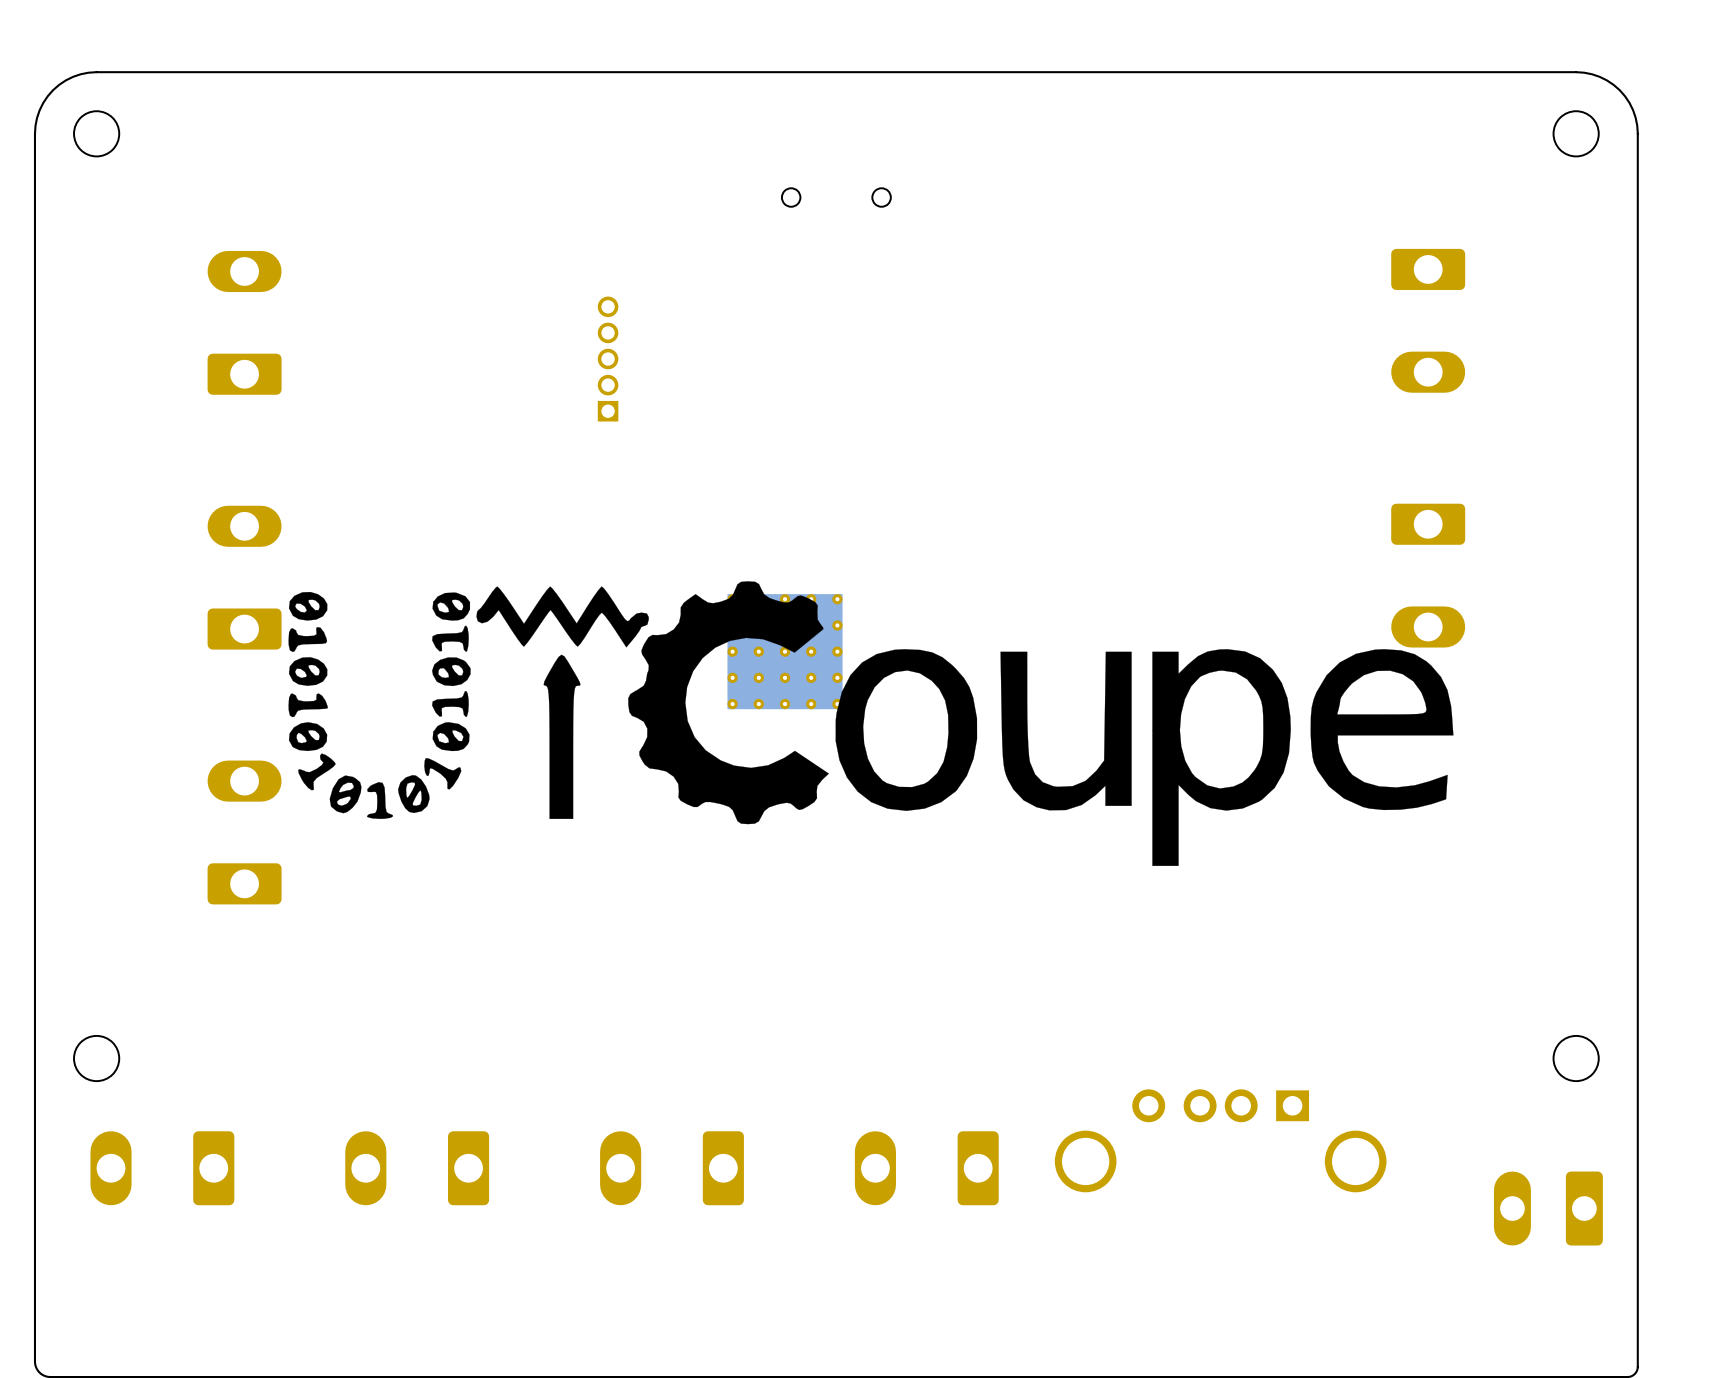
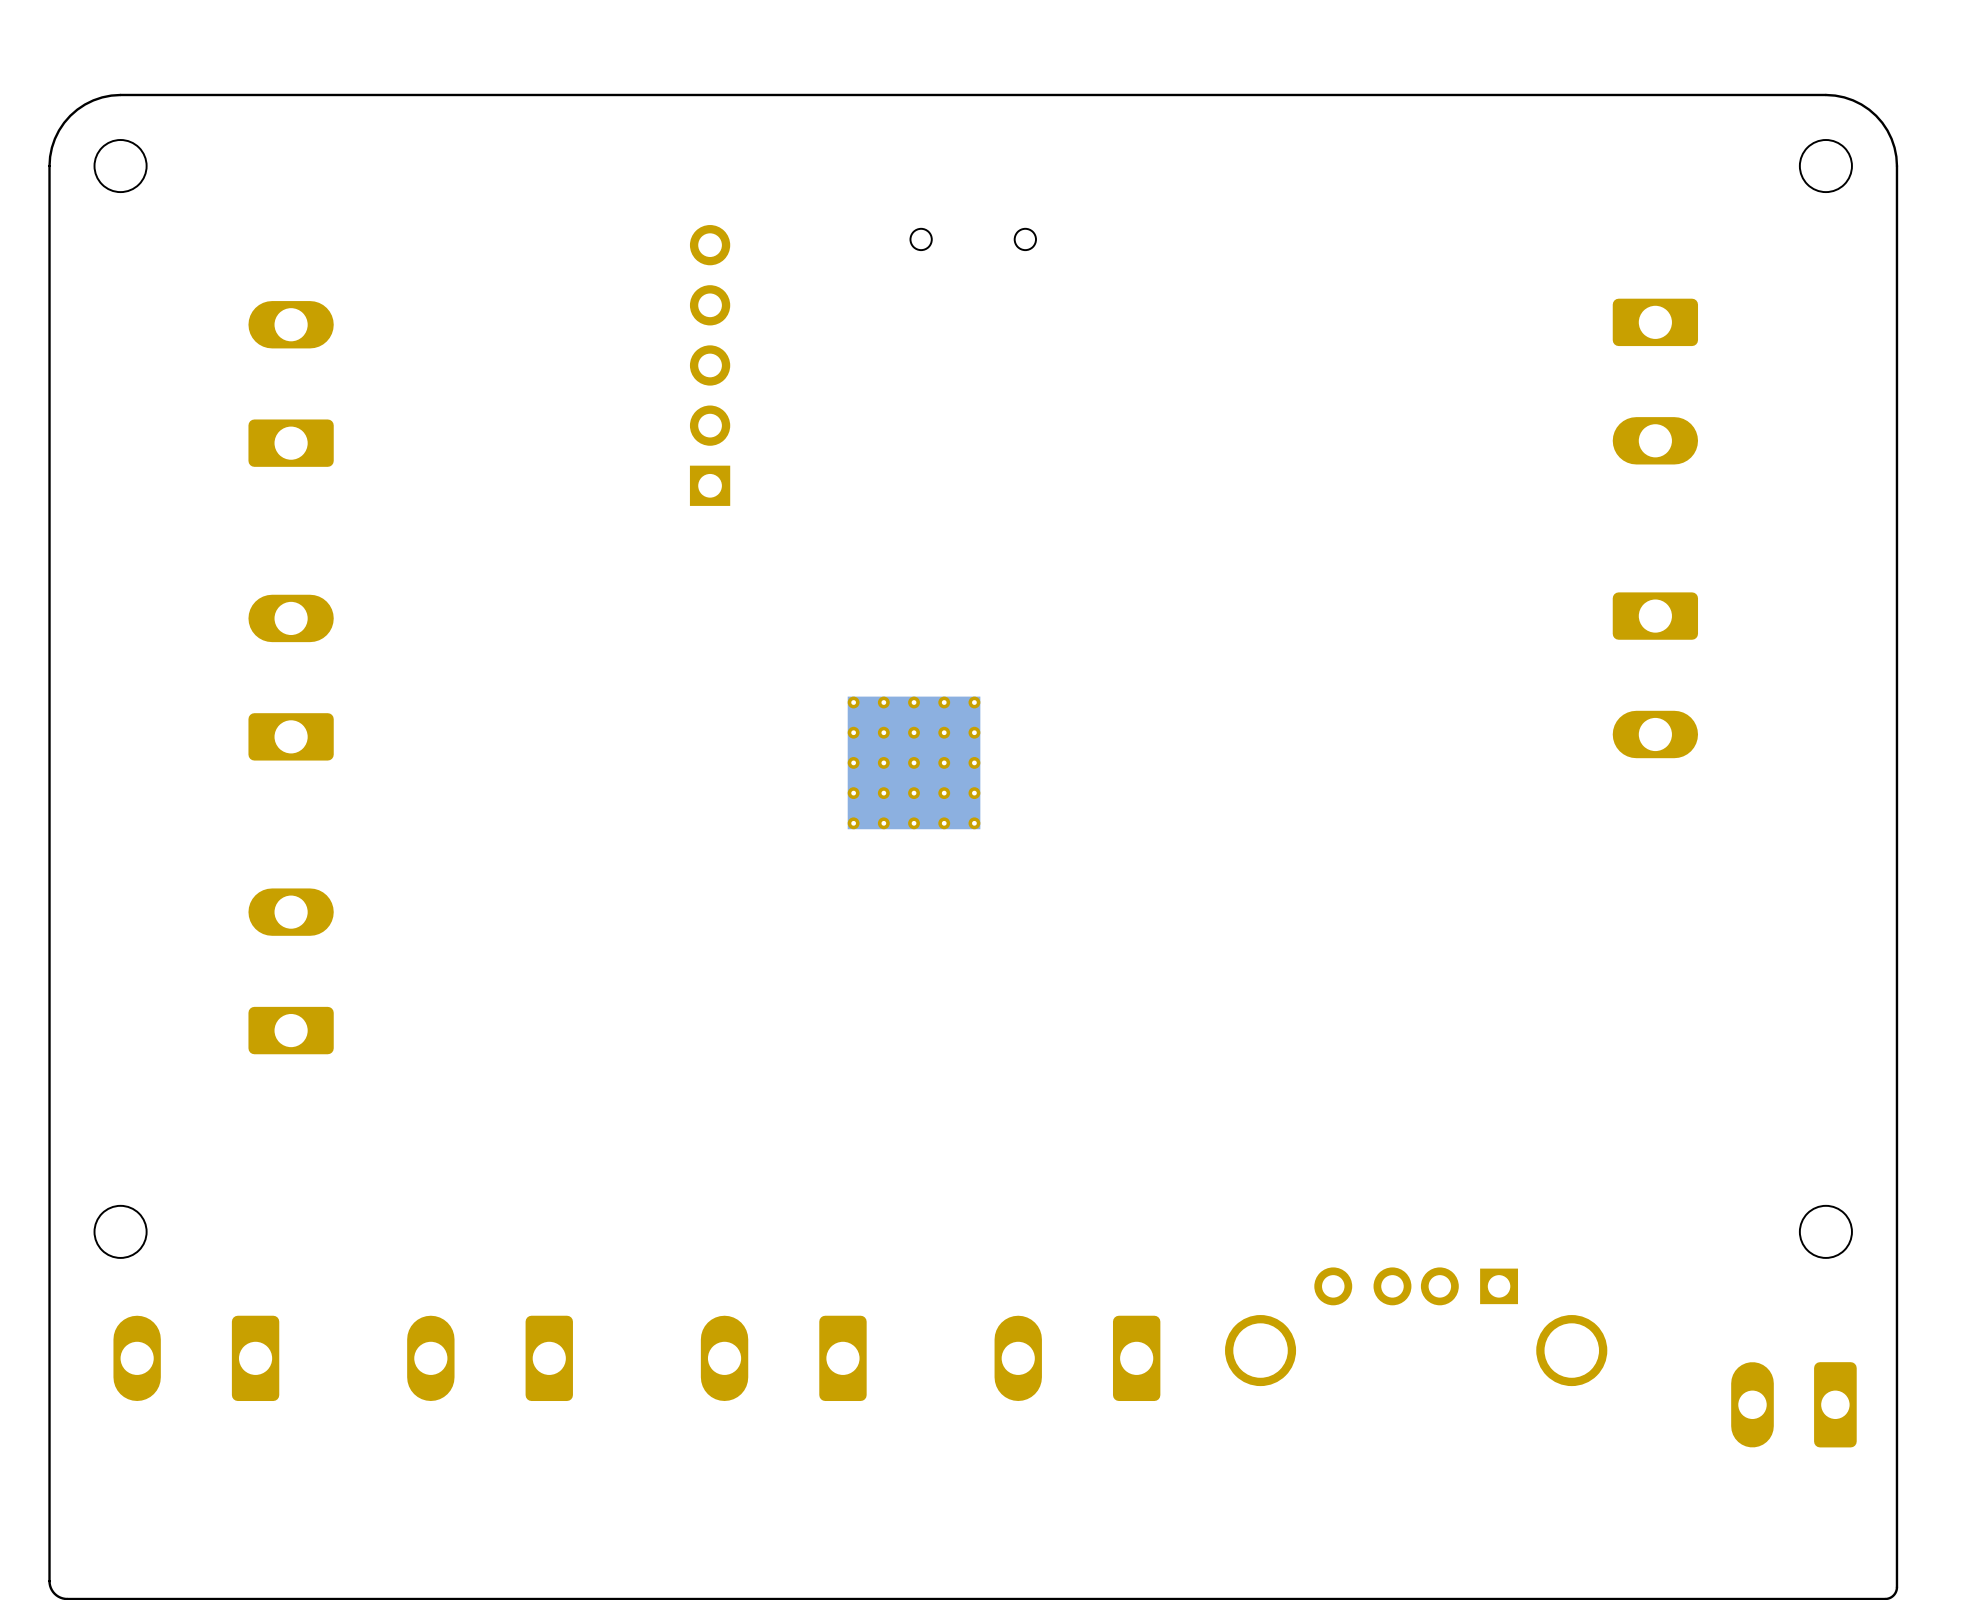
part: none -> (710, 365)
part: (608, 359) -> none
drawing: [288, 581, 1454, 866] -> none

